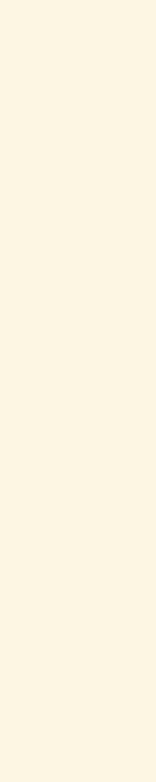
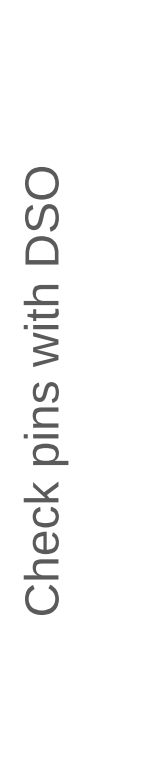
text: none -> Check pins with DSO (46, 390)

